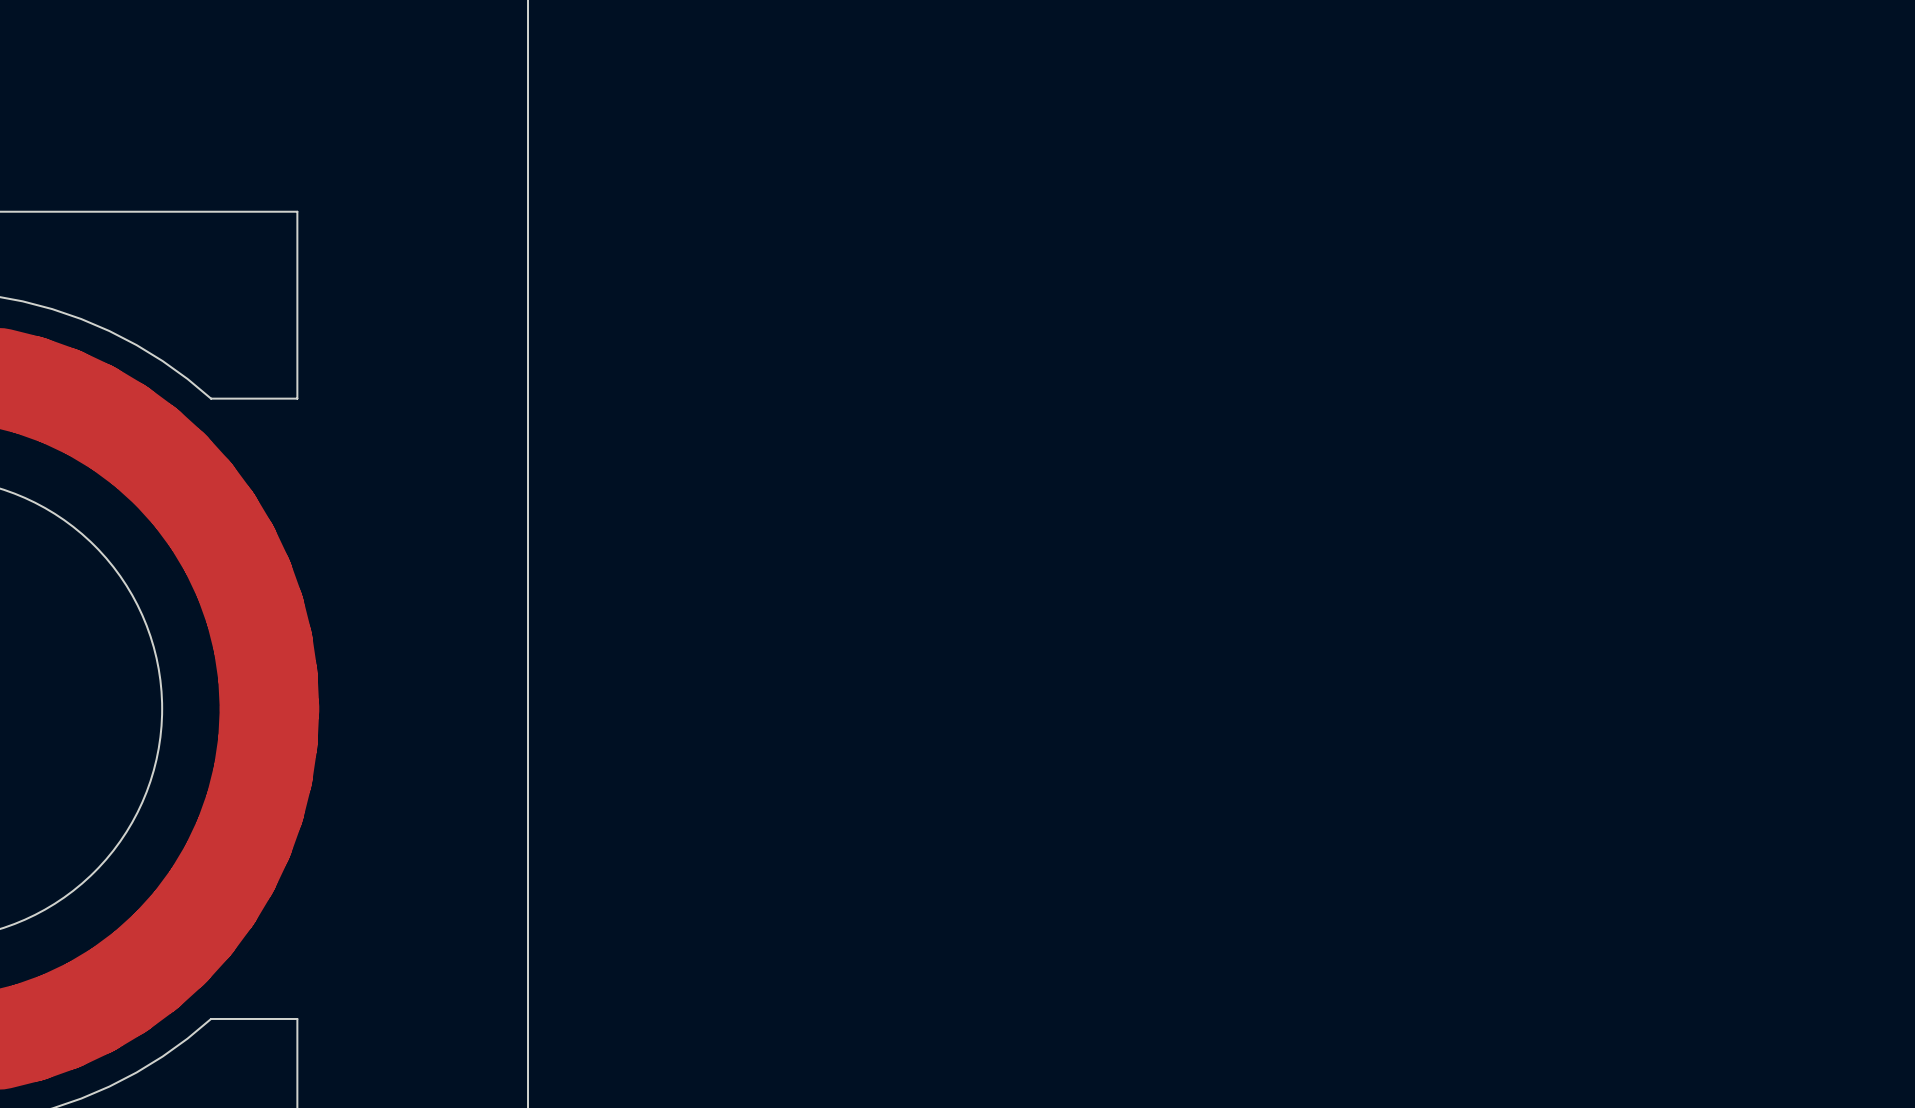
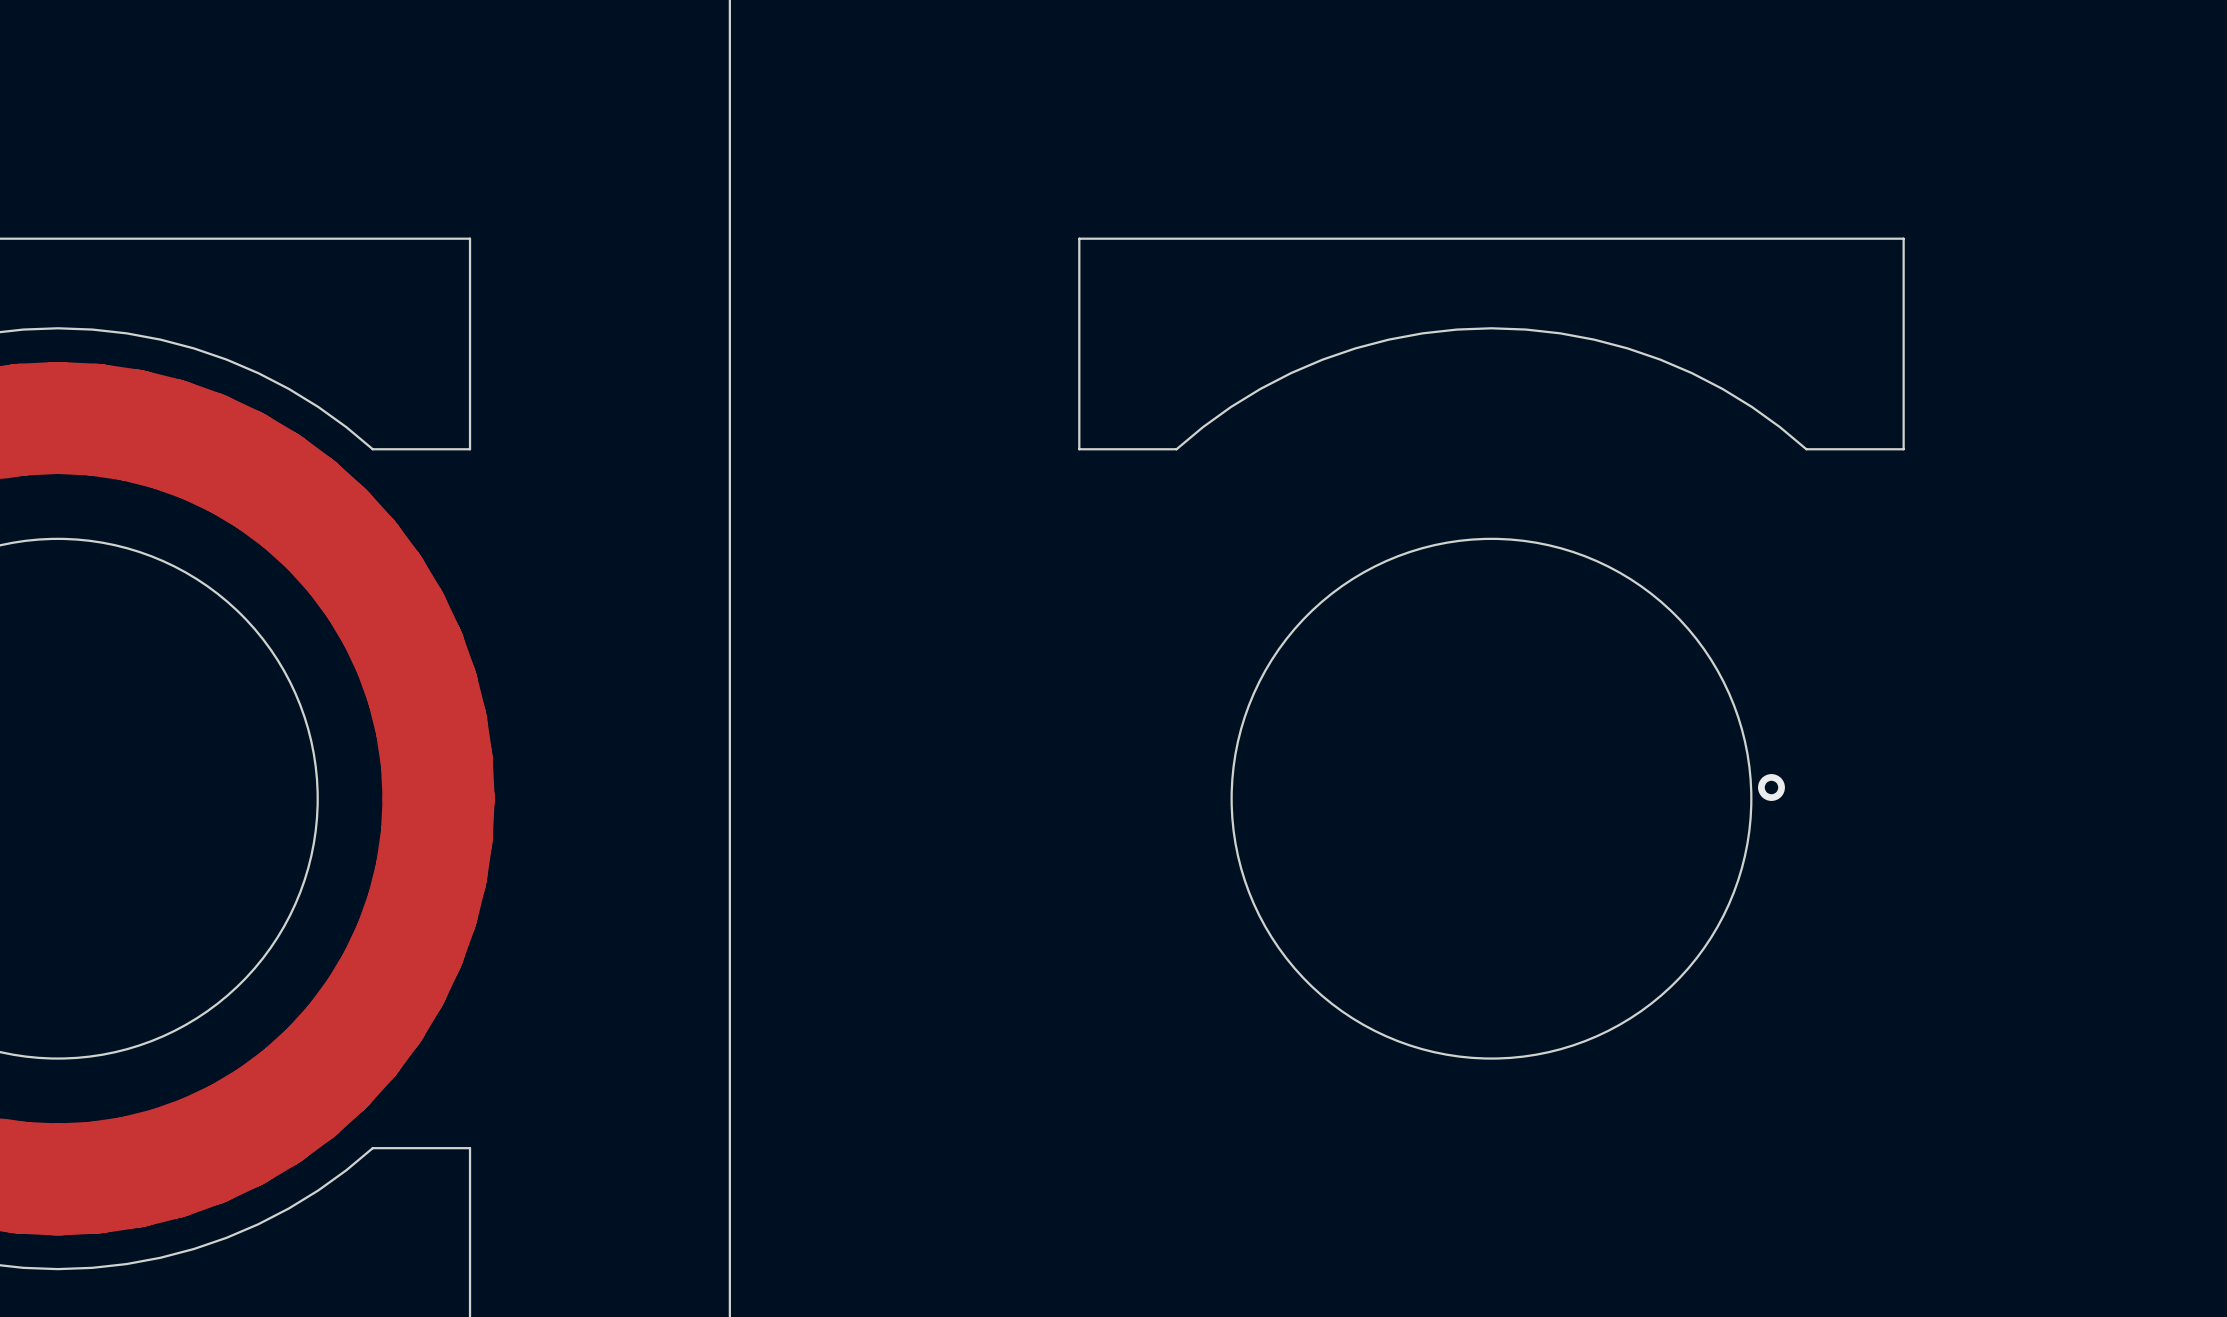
board edge: none -> (1079, 238) (1903, 238) (1903, 449) (1806, 449) (1751, 406) (1722, 388) (1660, 359) (1594, 339) (1525, 329) (1491, 328) (1422, 333) (1355, 348) (1322, 359) (1291, 373) (1231, 406) (1176, 449) (1079, 449) (1079, 238)
round board edge: none -> [1230, 537, 1753, 1060]
via: none -> (1771, 787)

